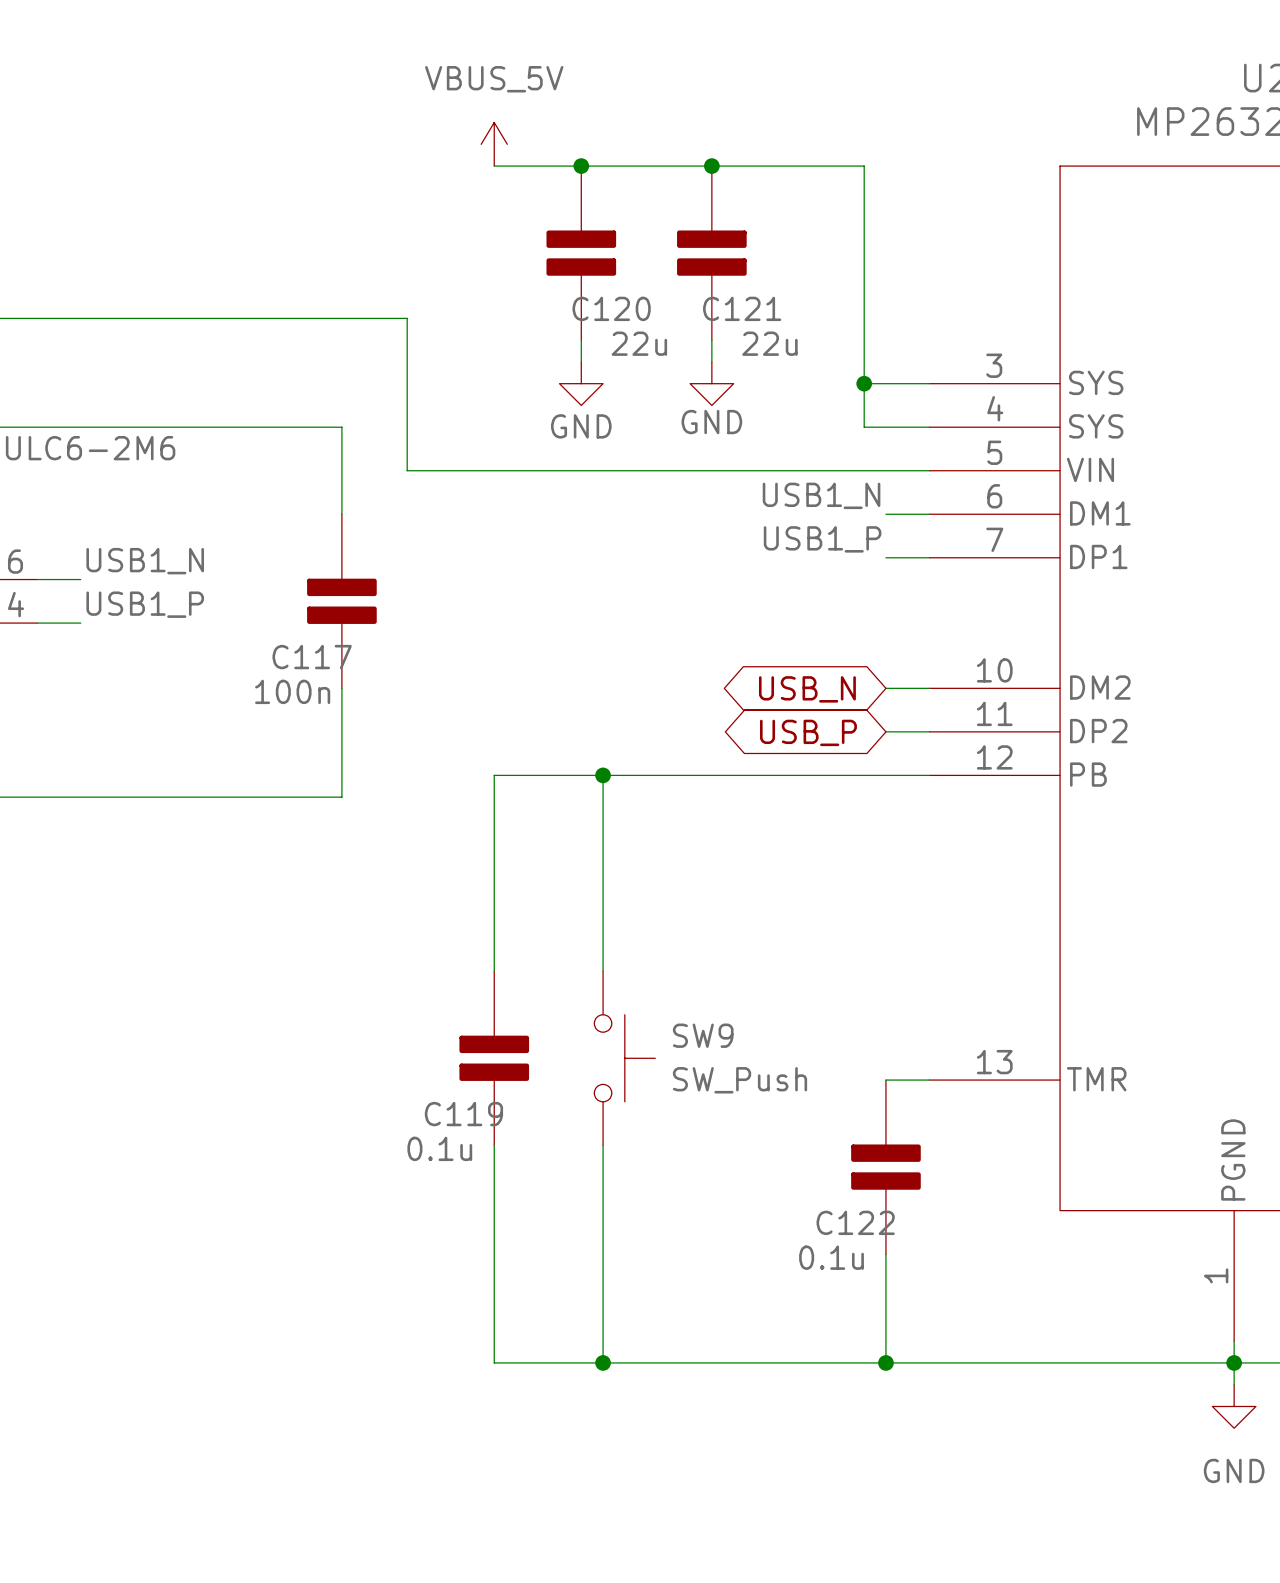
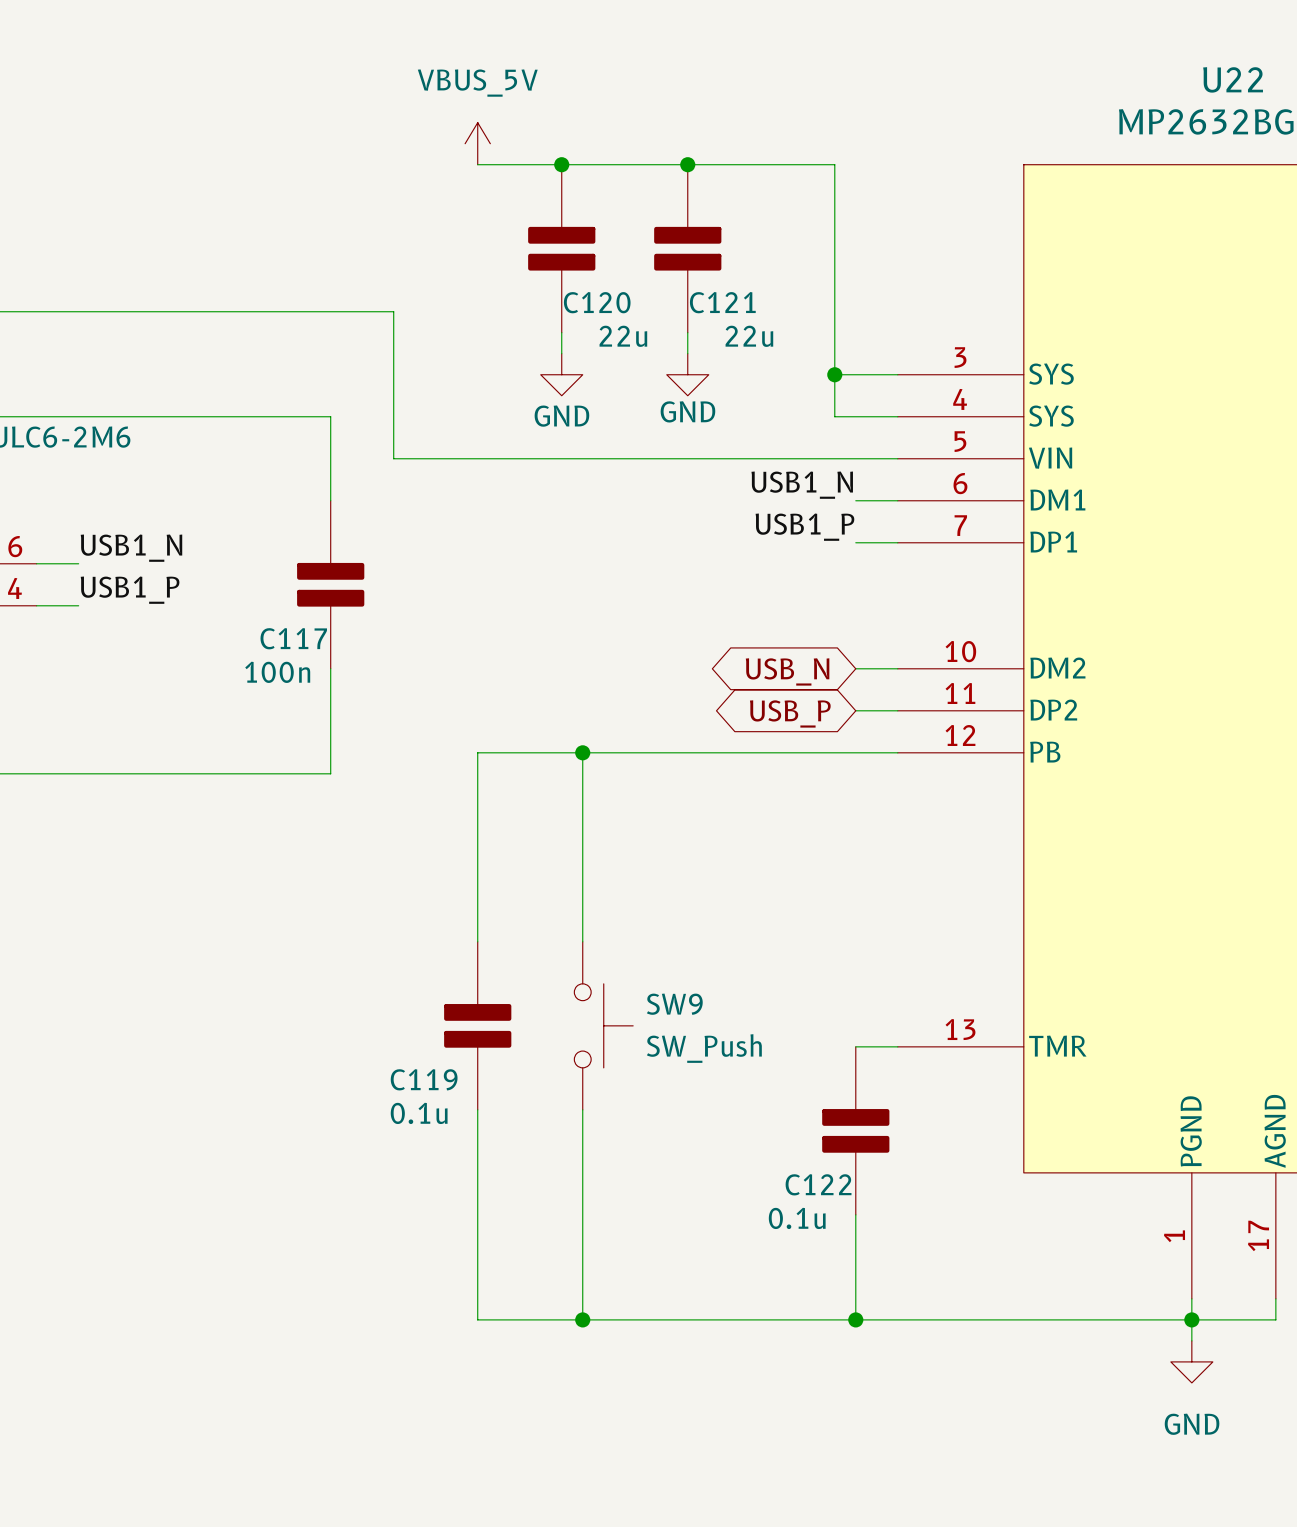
C119 name position: C119 (463, 1114) -> C119 (424, 1079)

